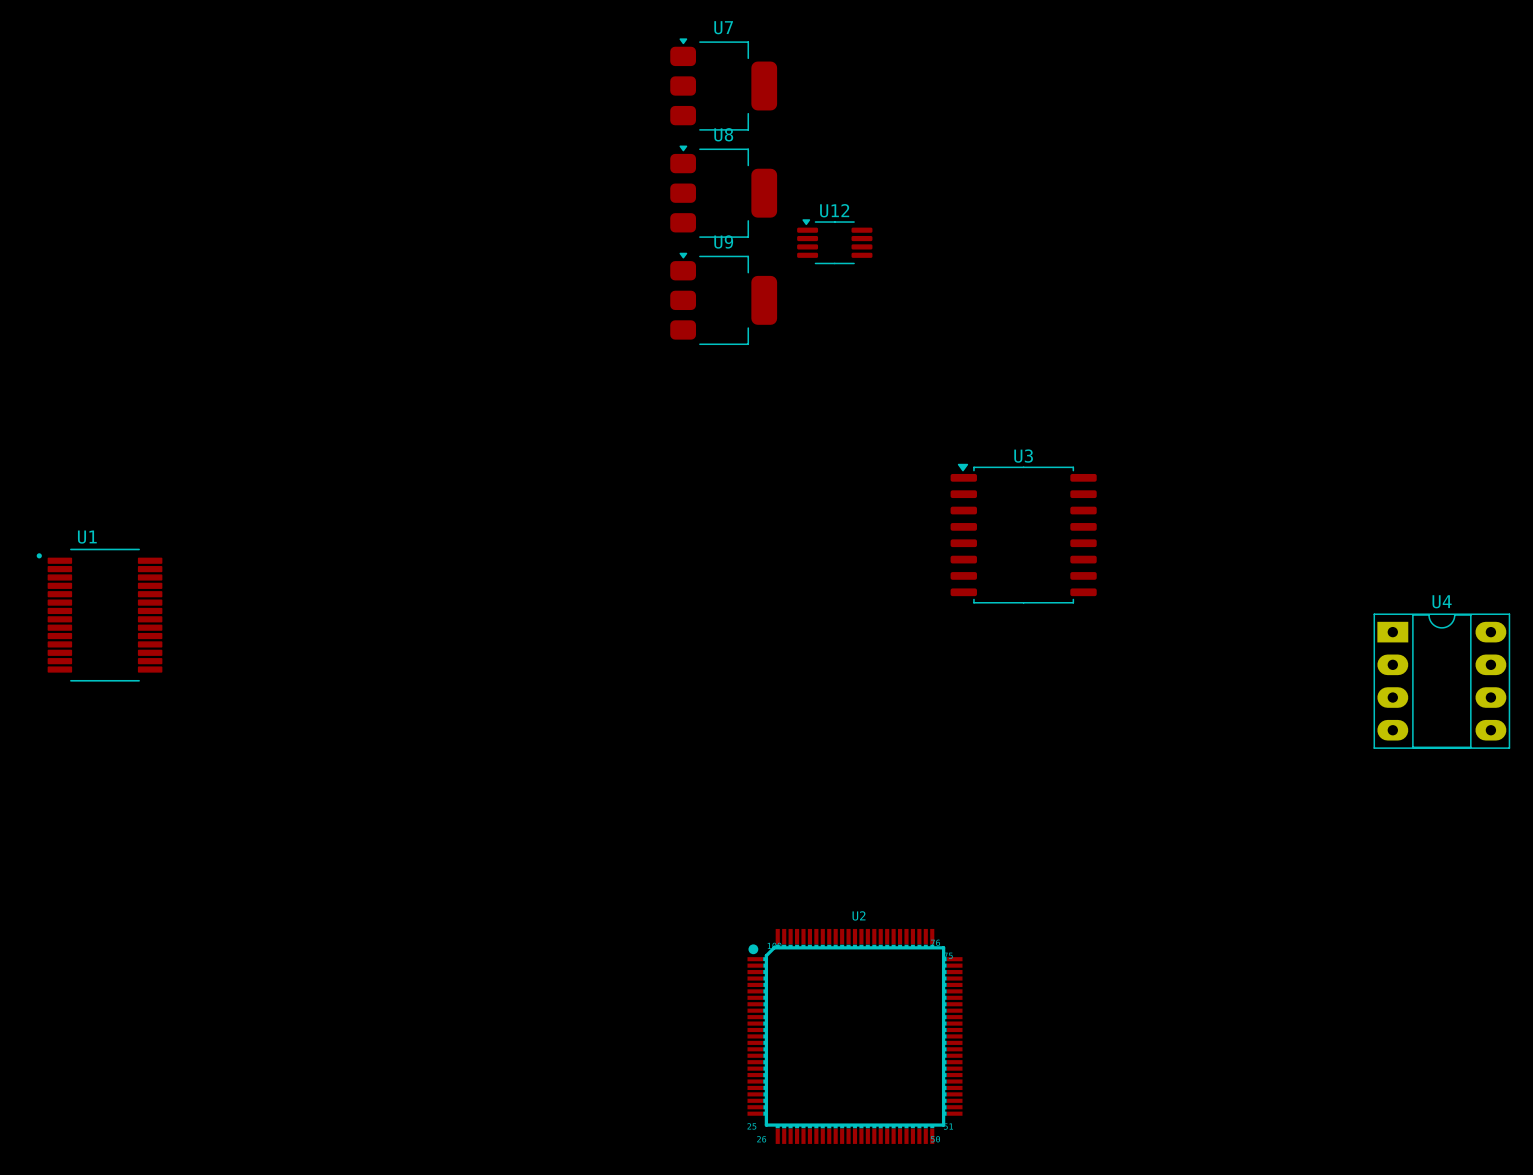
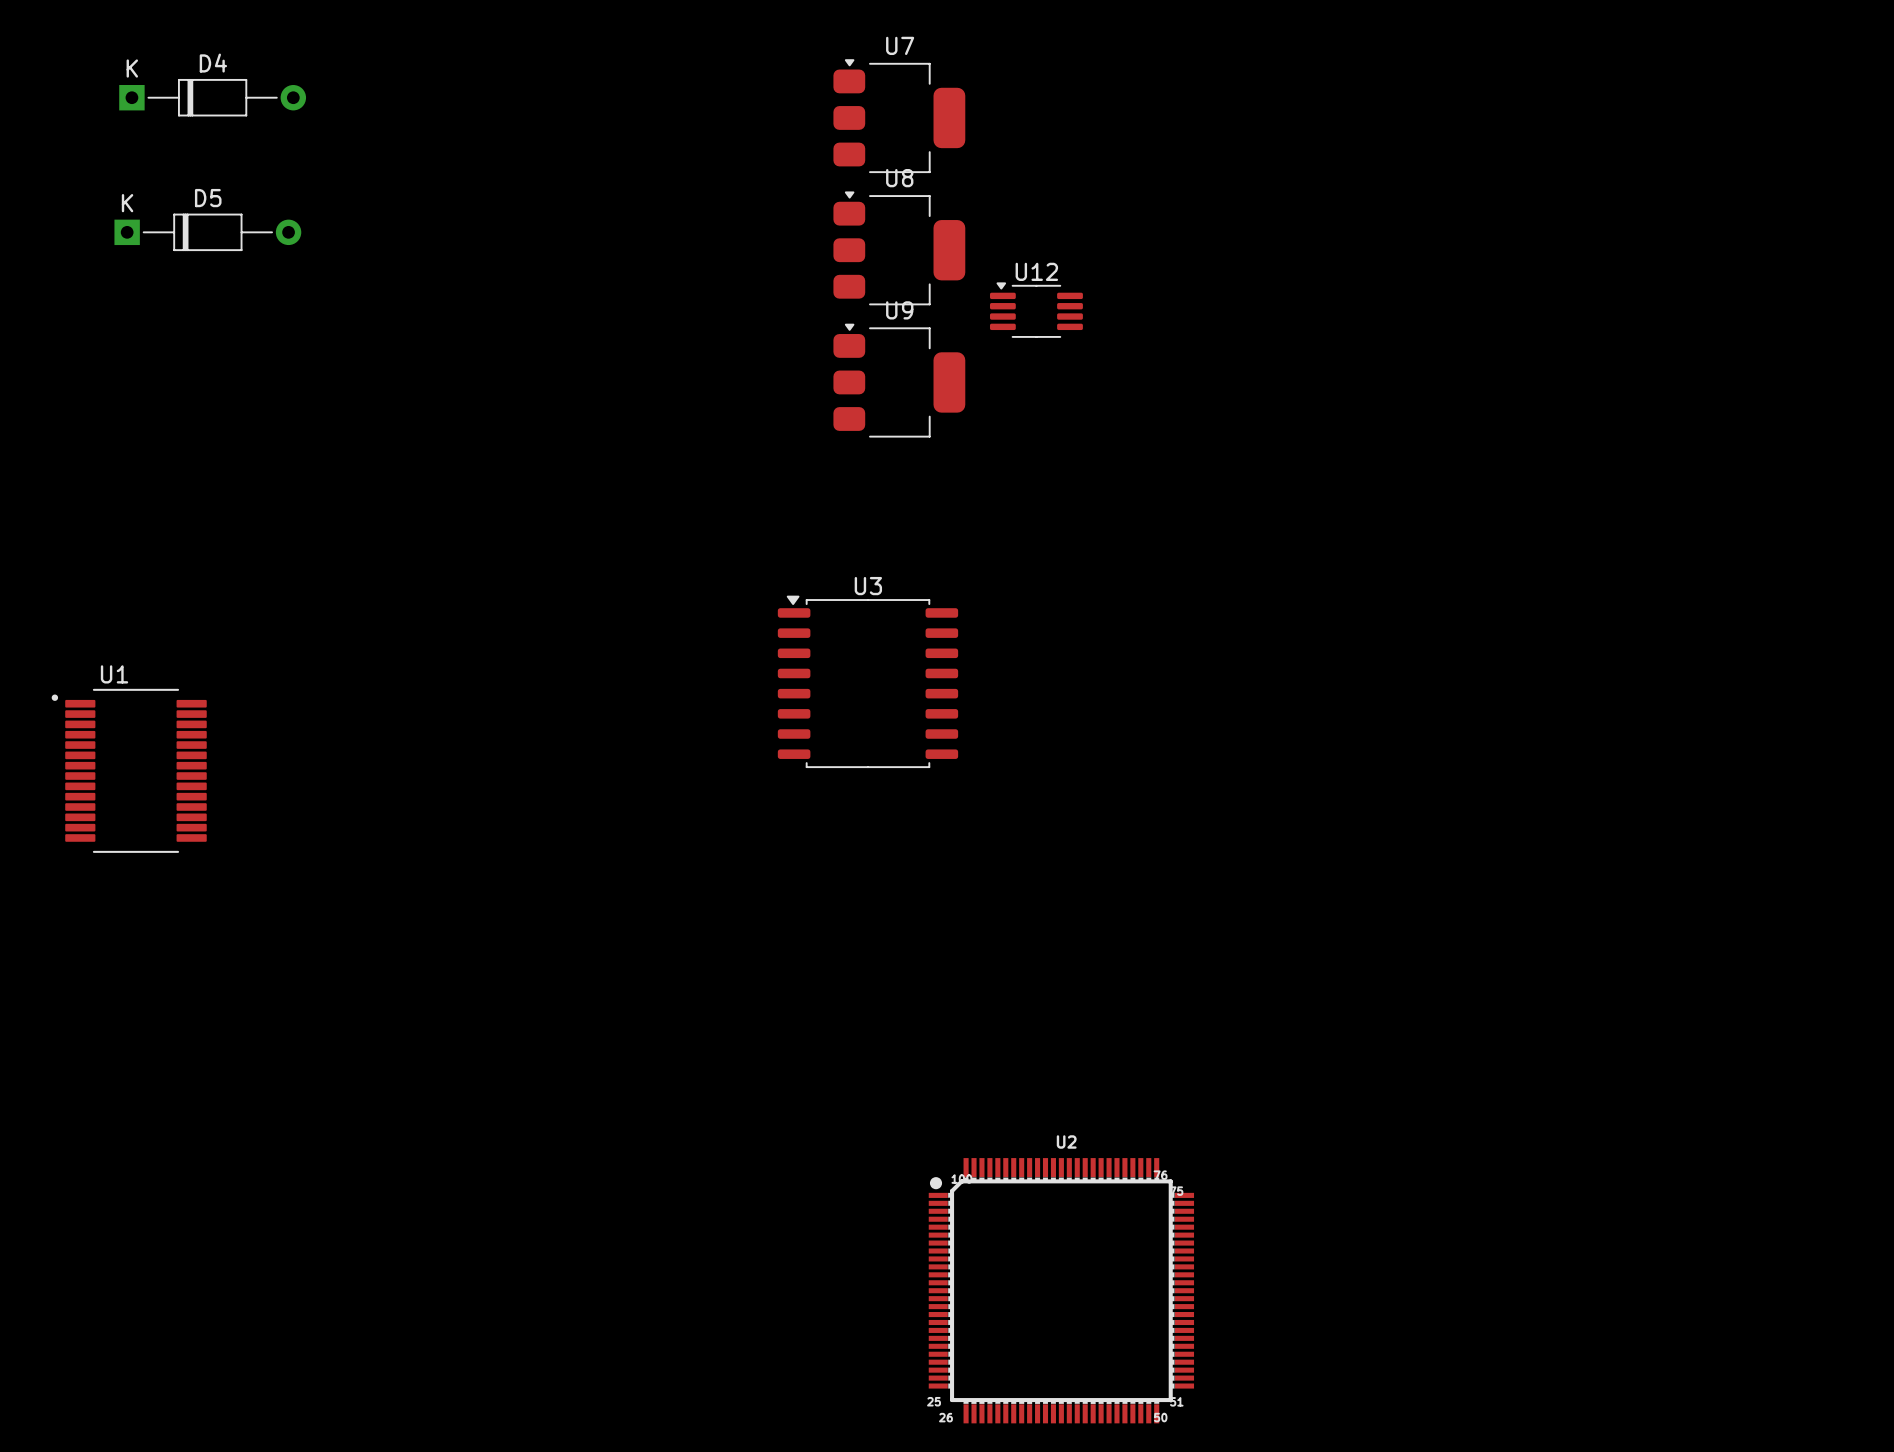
D4: none -> (212, 97)
D5: none -> (207, 232)
U3 position: (1023, 533) -> (867, 681)
U4: (1441, 681) -> none

